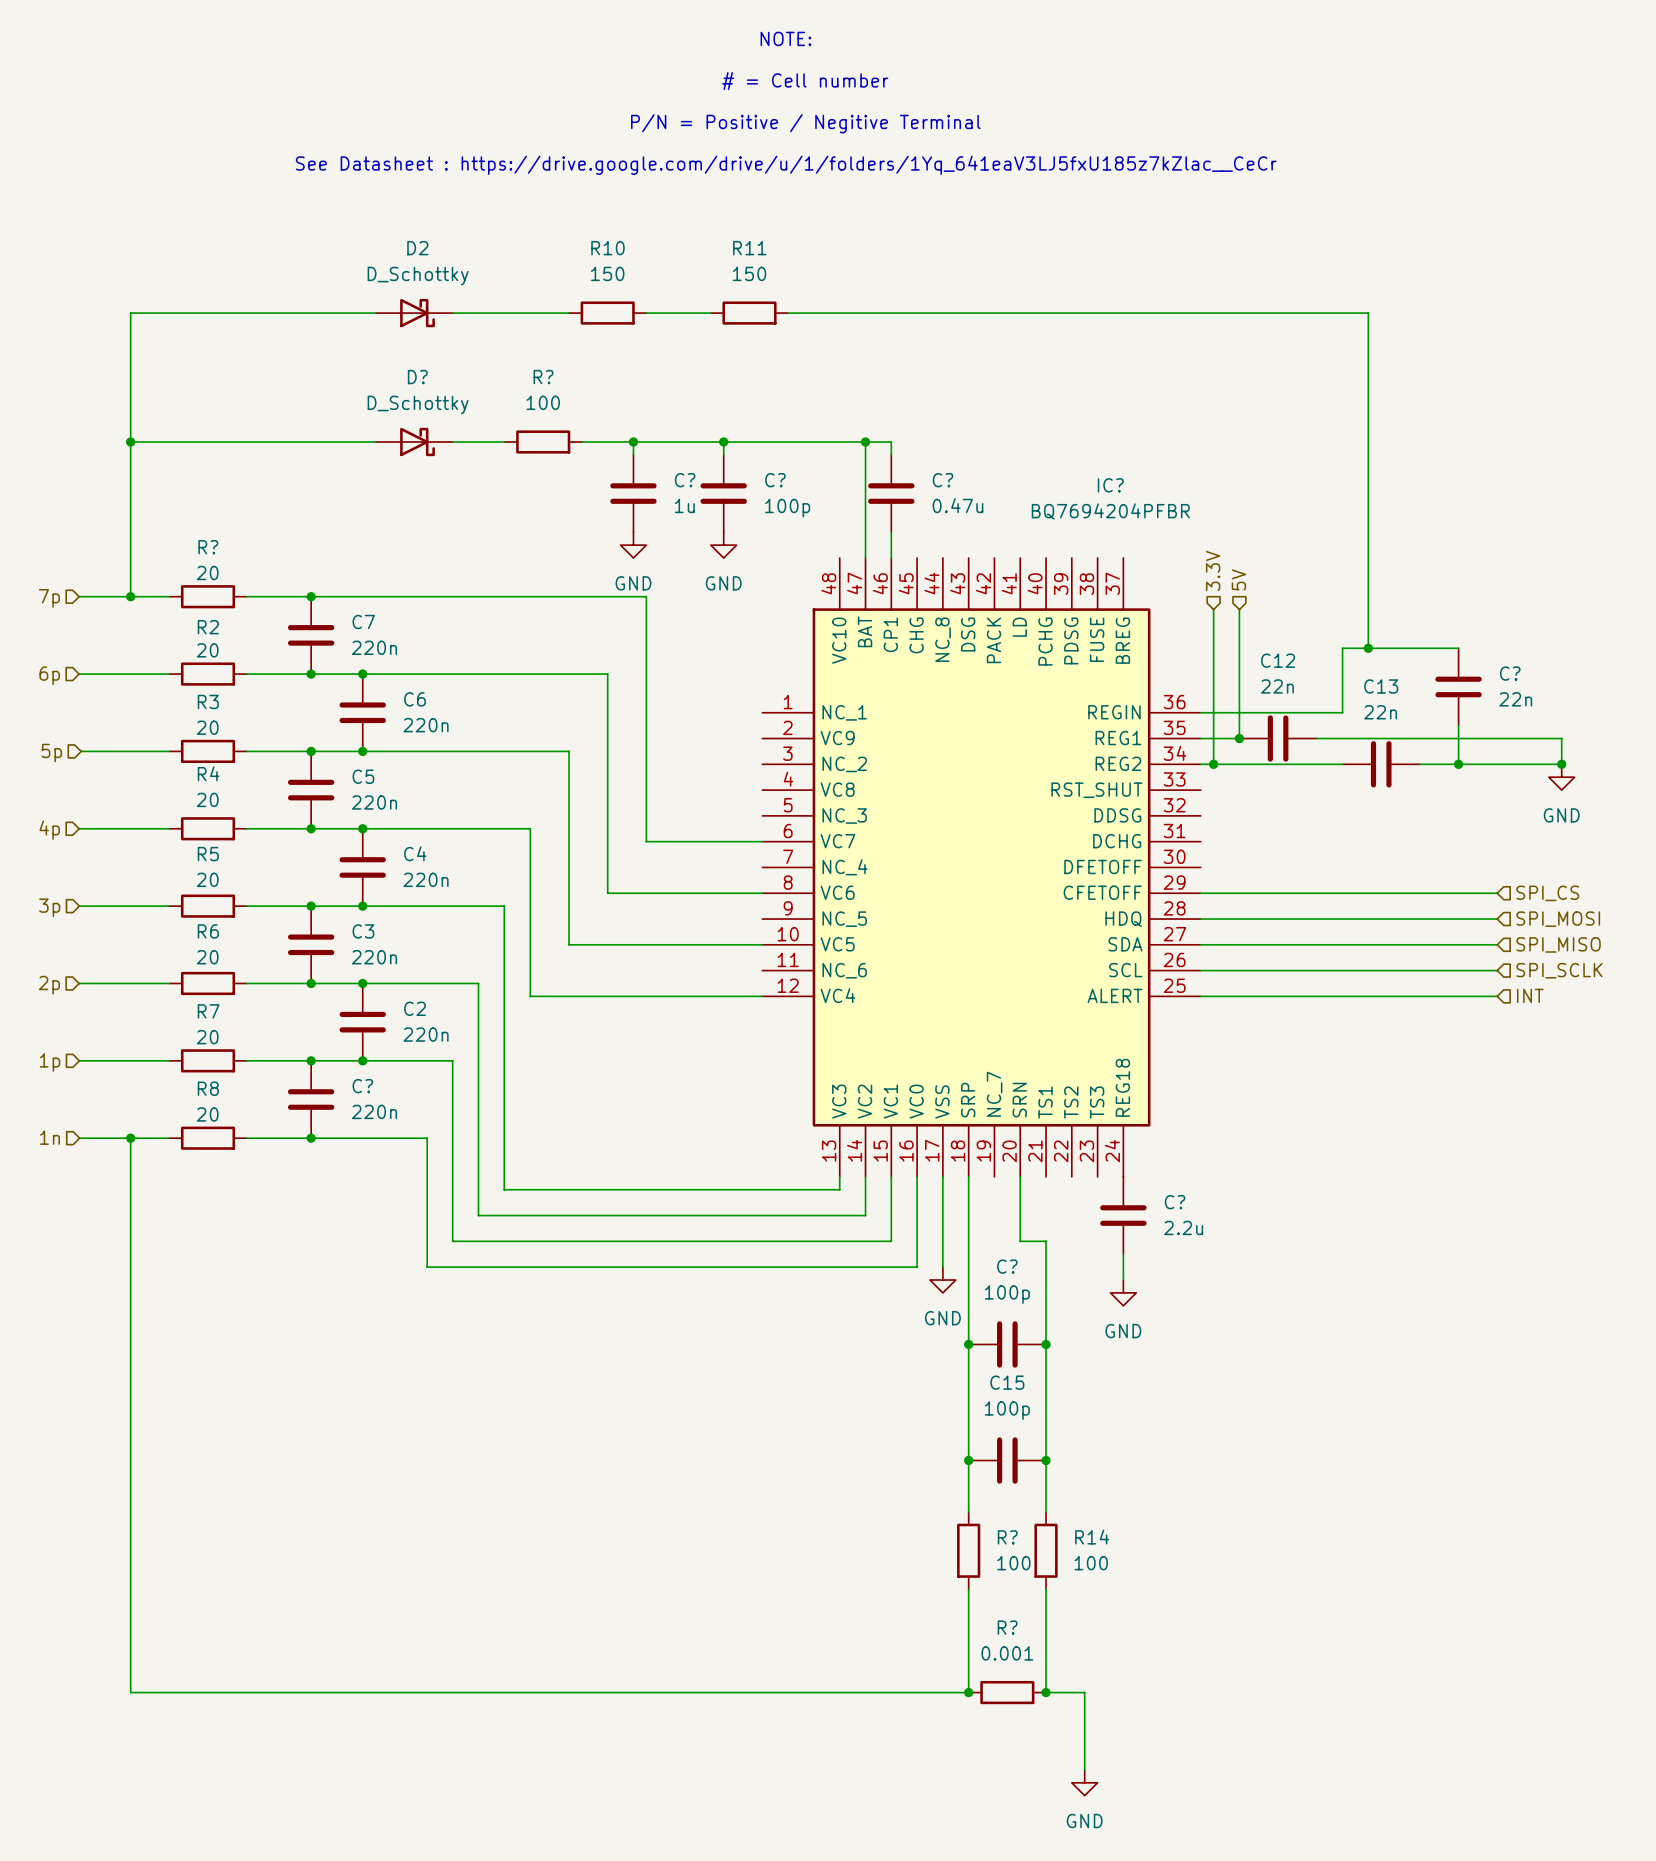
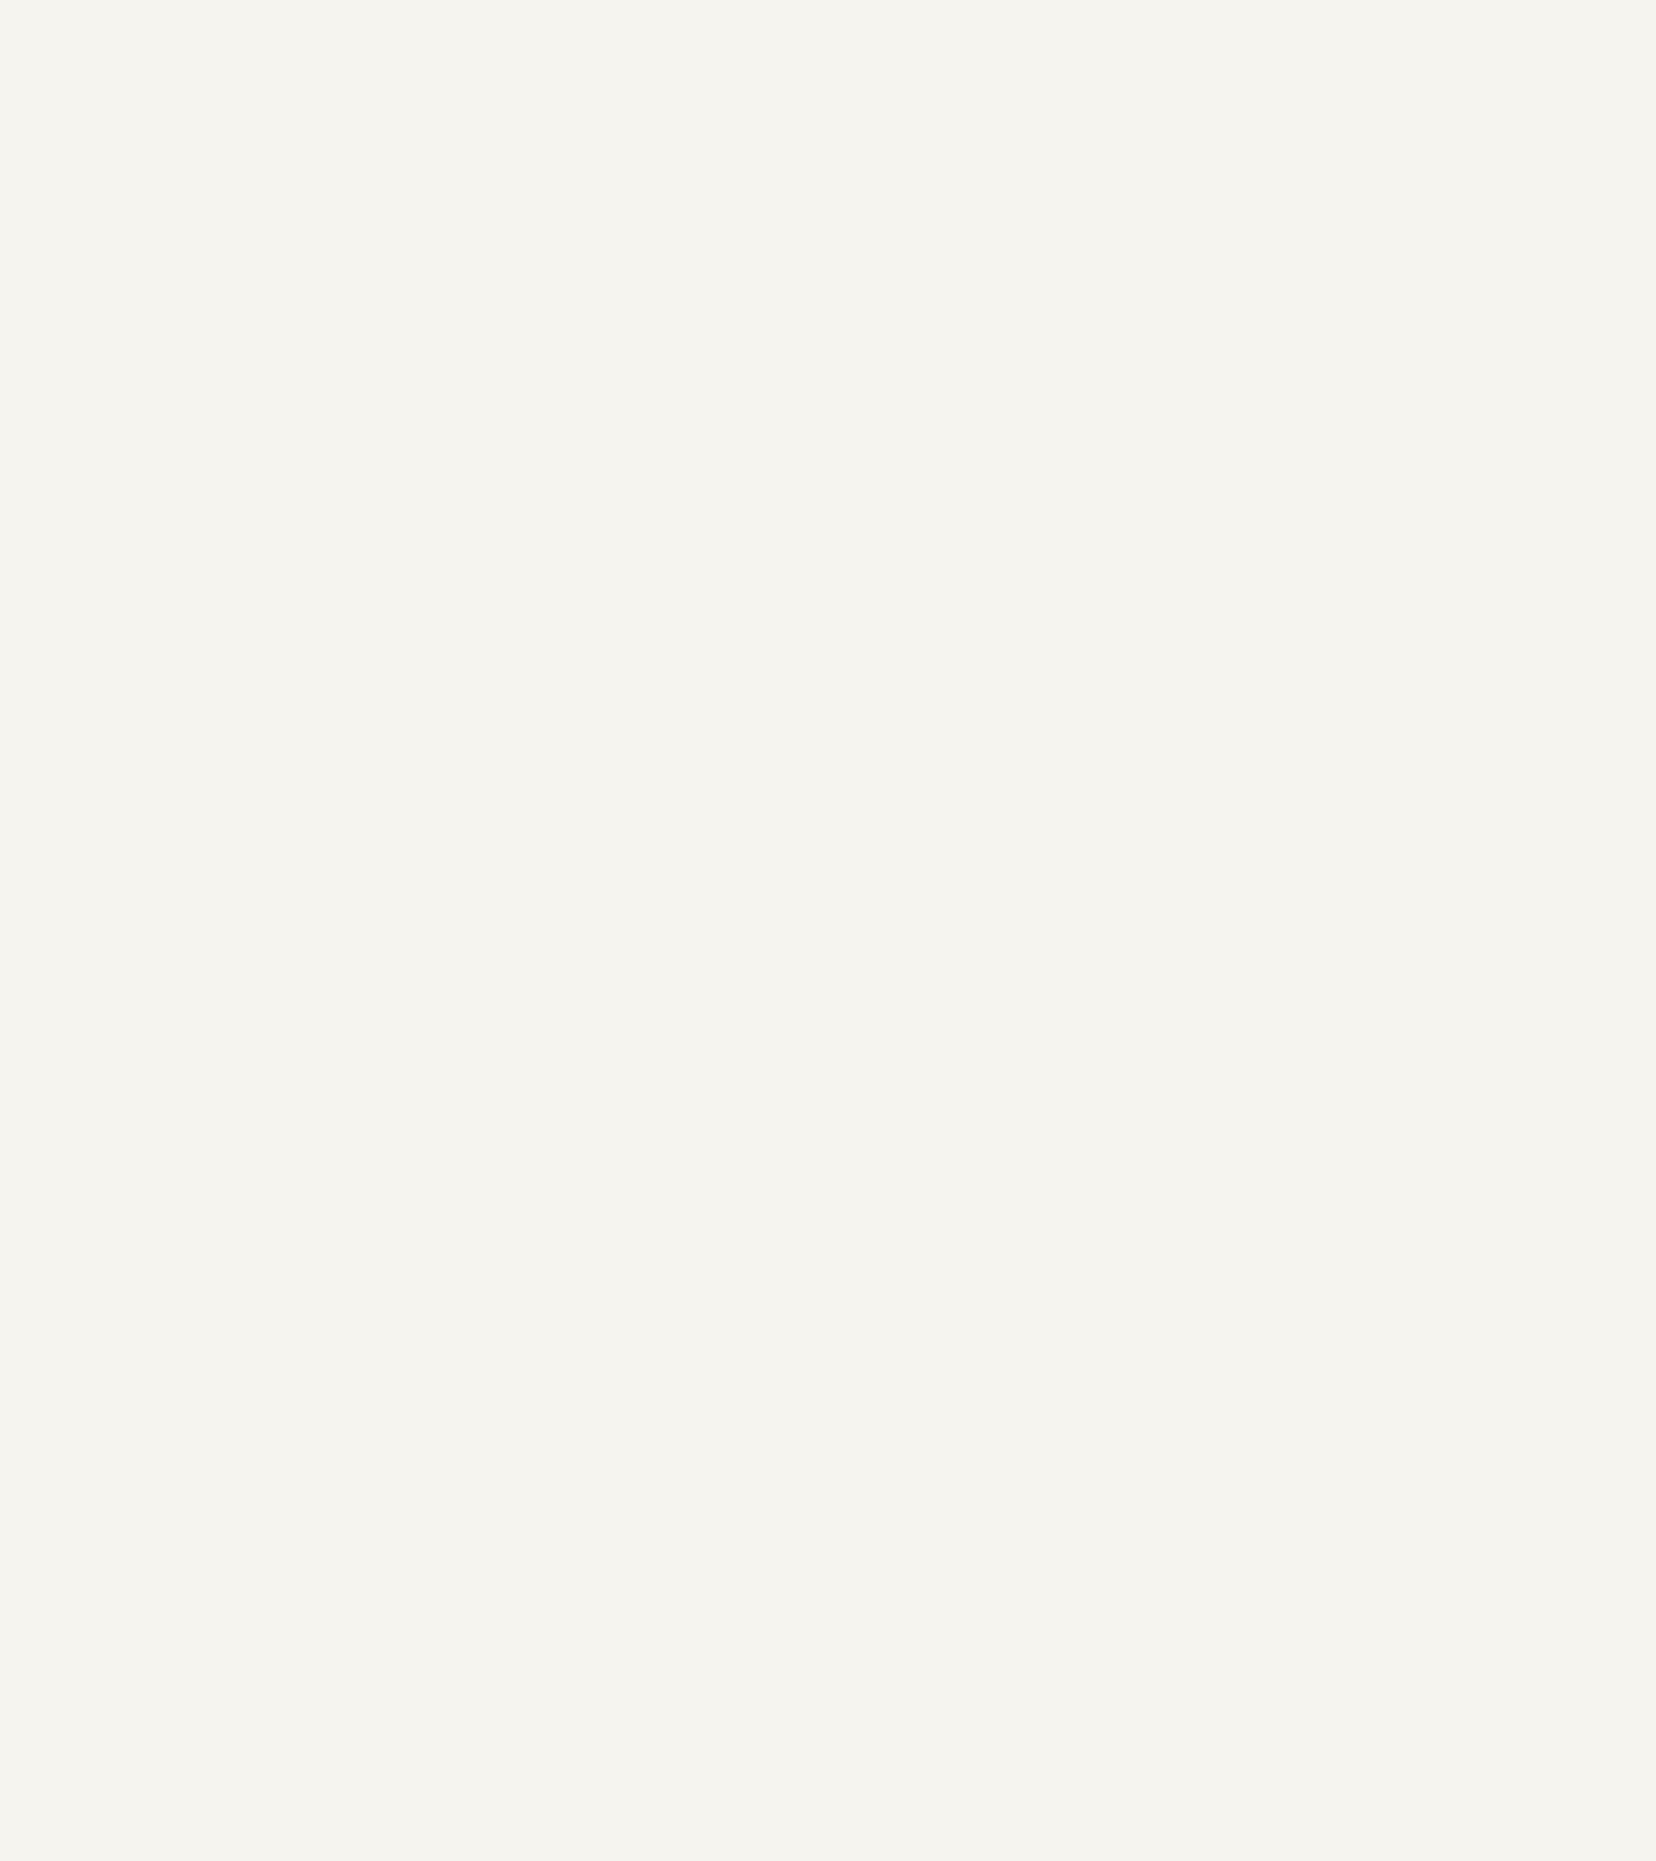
text: NOTE: (785, 38) -> none
text: # = Cell number (805, 81) -> none
text: P/N = Positive / Negitive Terminal (805, 123) -> none
text: See Datasheet : https://drive.google.com/drive/u/1/folders/1Yq_641eaV3LJ5fxU185z7kZlac__CeCr (786, 165) -> none
wire: (375, 313) (130, 313) (130, 596) -> none
D2: D_Schottky (414, 313) -> none
wire: (452, 313) (569, 313) -> none
R10: 150 (607, 313) -> none
wire: (646, 313) (710, 313) -> none
R11: 150 (749, 313) -> none
wire: (788, 313) (1368, 313) (1368, 648) -> none
wire: (130, 442) (375, 442) -> none
junction: (130, 442) -> none
D?: D_Schottky (414, 442) -> none
wire: (452, 442) (504, 442) -> none
R?: 100 (543, 442) -> none
wire: (581, 442) (891, 442) (891, 454) -> none
wire: (633, 442) (633, 454) -> none
junction: (633, 442) -> none
wire: (723, 442) (723, 454) -> none
junction: (723, 442) -> none
wire: (865, 442) (865, 558) -> none
junction: (865, 442) -> none
C?: 1u (633, 493) -> none
C?: 100p (723, 493) -> none
C?: 0.47u (891, 493) -> none
wire: (891, 532) (891, 558) -> none
power symbol: GND (633, 545) -> none
power symbol: GND (723, 545) -> none
hierarchical label: 3.3V (1213, 571) -> none
hierarchical label: 5V (1238, 579) -> none
wire: (79, 596) (169, 596) -> none
junction: (130, 596) -> none
R?: 20 (208, 596) -> none
wire: (246, 596) (646, 596) (646, 841) (762, 841) -> none
junction: (311, 596) -> none
hierarchical label: 7p (49, 598) -> none
wire: (1213, 609) (1213, 764) -> none
wire: (1239, 609) (1239, 738) (1200, 738) -> none
C7: 220n (311, 635) -> none
junction: (1368, 648) -> none
wire: (1458, 648) (1342, 648) (1342, 712) (1200, 712) -> none
wire: (79, 674) (169, 674) -> none
R2: 20 (208, 674) -> none
wire: (246, 674) (607, 674) (607, 893) (762, 893) -> none
junction: (311, 674) -> none
junction: (362, 674) -> none
hierarchical label: 6p (49, 675) -> none
C?: 22n (1458, 686) -> none
C6: 220n (362, 712) -> none
wire: (1458, 725) (1458, 764) -> none
junction: (1239, 738) -> none
C12: 22n (1278, 738) -> none
wire: (1316, 738) (1561, 738) (1561, 764) (1419, 764) -> none
wire: (81, 751) (169, 751) -> none
R3: 20 (208, 751) -> none
wire: (246, 751) (569, 751) (569, 944) (762, 944) -> none
junction: (311, 751) -> none
junction: (362, 751) -> none
hierarchical label: 5p (51, 753) -> none
wire: (1200, 764) (1342, 764) -> none
junction: (1213, 764) -> none
C13: 22n (1381, 764) -> none
junction: (1458, 764) -> none
junction: (1561, 764) -> none
power symbol: GND (1561, 777) -> none
C5: 220n (311, 790) -> none
wire: (79, 828) (169, 828) -> none
R4: 20 (208, 828) -> none
wire: (246, 828) (530, 828) (530, 996) (762, 996) -> none
junction: (311, 828) -> none
junction: (362, 828) -> none
hierarchical label: 4p (49, 830) -> none
C4: 220n (362, 867) -> none
IC?: BQ7694204PFBR (981, 867) -> none
wire: (1200, 893) (1497, 893) -> none
hierarchical label: SPI_CS (1547, 893) -> none
wire: (79, 906) (169, 906) -> none
R5: 20 (208, 906) -> none
wire: (246, 906) (504, 906) (504, 1189) (839, 1189) (839, 1176) -> none
junction: (311, 906) -> none
junction: (362, 906) -> none
hierarchical label: 3p (49, 907) -> none
wire: (1200, 919) (1497, 919) -> none
hierarchical label: SPI_MOSI (1558, 919) -> none
C3: 220n (311, 944) -> none
wire: (1200, 944) (1497, 944) -> none
hierarchical label: SPI_MISO (1558, 944) -> none
wire: (1200, 970) (1497, 970) -> none
hierarchical label: SPI_SCLK (1559, 970) -> none
wire: (79, 983) (169, 983) -> none
R6: 20 (208, 983) -> none
wire: (246, 983) (478, 983) (478, 1215) (865, 1215) (865, 1176) -> none
junction: (311, 983) -> none
junction: (362, 983) -> none
hierarchical label: 2p (49, 985) -> none
hierarchical label: INT (1530, 995) -> none
wire: (1200, 996) (1497, 996) -> none
C2: 220n (362, 1022) -> none
wire: (79, 1060) (169, 1060) -> none
R7: 20 (208, 1060) -> none
wire: (246, 1060) (452, 1060) (452, 1241) (891, 1241) (891, 1176) -> none
junction: (311, 1060) -> none
junction: (362, 1060) -> none
hierarchical label: 1p (50, 1062) -> none
C?: 220n (311, 1099) -> none
hierarchical label: 1n (49, 1137) -> none
wire: (79, 1138) (169, 1138) -> none
wire: (130, 1138) (130, 1692) (968, 1692) (968, 1589) -> none
junction: (130, 1138) -> none
R8: 20 (208, 1138) -> none
wire: (246, 1138) (427, 1138) (427, 1267) (917, 1267) (917, 1176) -> none
junction: (311, 1138) -> none
wire: (942, 1176) (942, 1267) -> none
wire: (968, 1176) (968, 1512) -> none
wire: (1020, 1176) (1020, 1241) (1046, 1241) (1046, 1512) -> none
C?: 2.2u (1123, 1215) -> none
wire: (1123, 1254) (1123, 1280) -> none
power symbol: GND (942, 1280) -> none
power symbol: GND (1123, 1292) -> none
junction: (968, 1344) -> none
C?: 100p (1007, 1344) -> none
junction: (1046, 1344) -> none
junction: (968, 1460) -> none
C15: 100p (1007, 1460) -> none
junction: (1046, 1460) -> none
R?: 100 (968, 1550) -> none
R14: 100 (1046, 1550) -> none
wire: (1046, 1589) (1046, 1692) (1084, 1692) (1084, 1769) -> none
junction: (968, 1692) -> none
R?: 0.001 (1007, 1692) -> none
junction: (1046, 1692) -> none
power symbol: GND (1084, 1782) -> none

